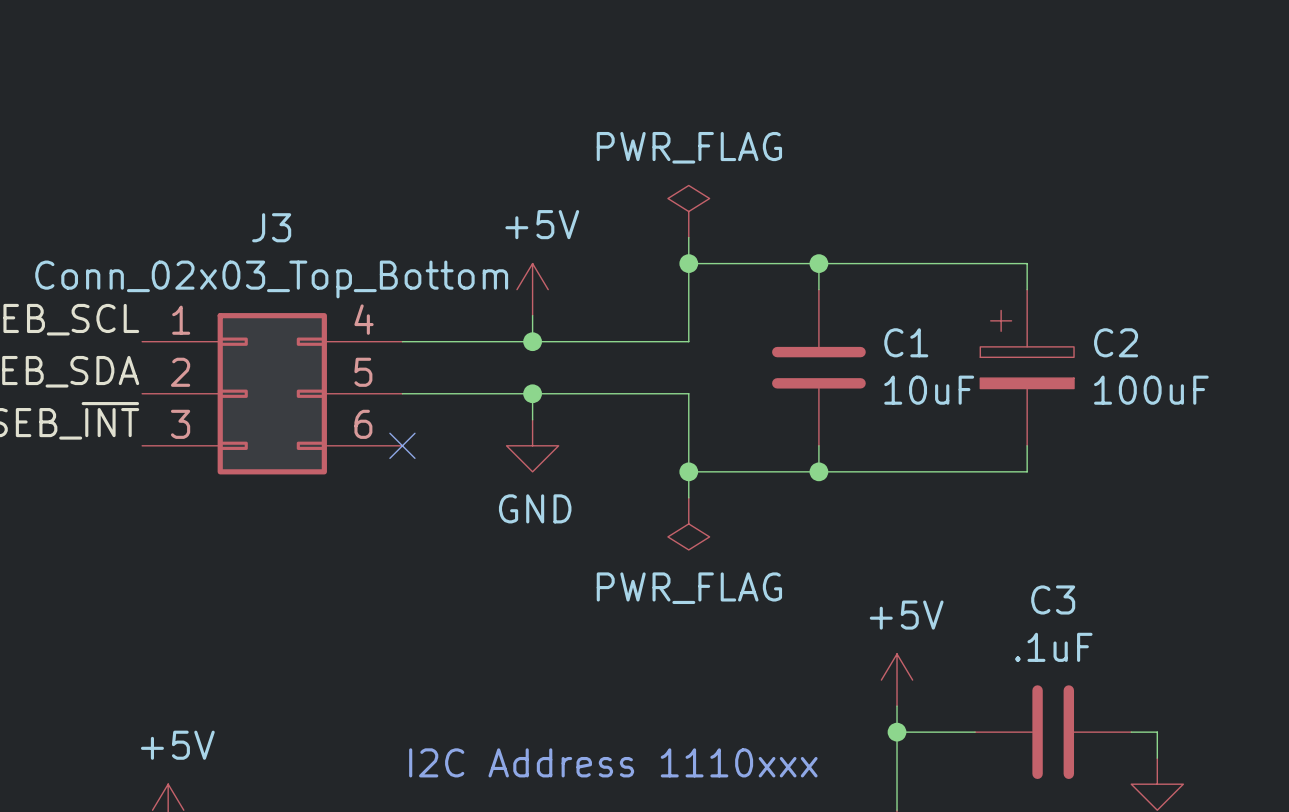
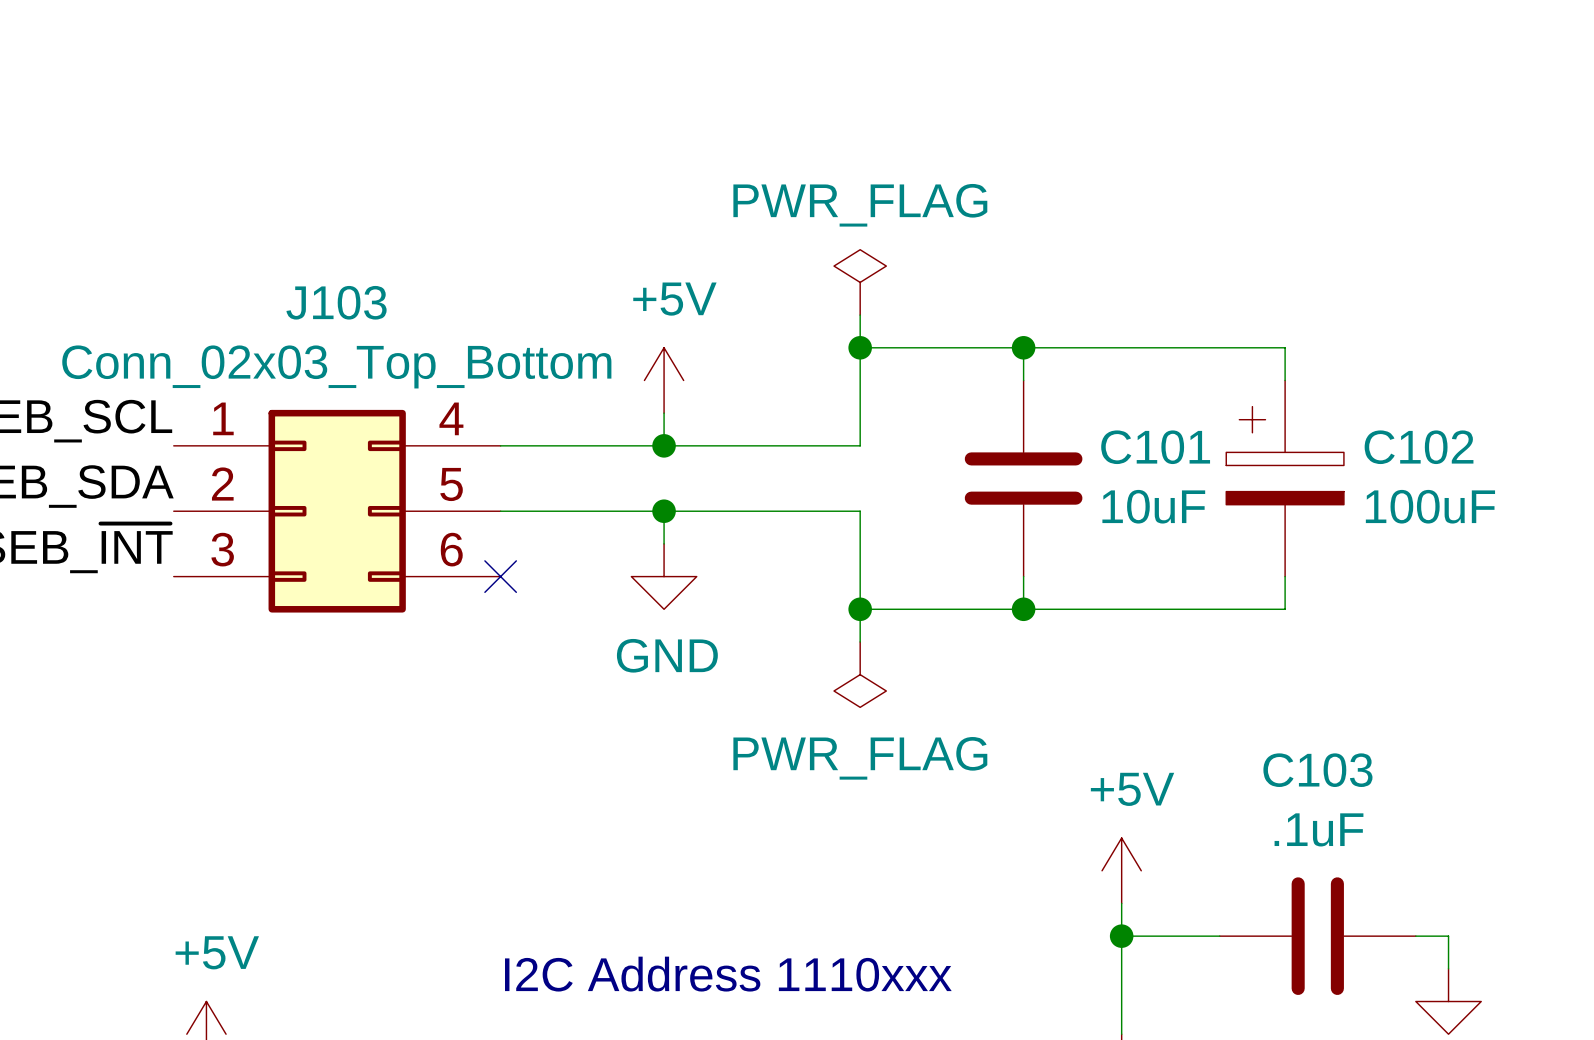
J3 name: J3 (271, 227) -> J103 (336, 302)
C1 name: C1 (906, 342) -> C101 (1155, 447)
C2 name: C2 (1116, 342) -> C102 (1419, 447)
C3 name: C3 (1053, 599) -> C103 (1317, 770)

